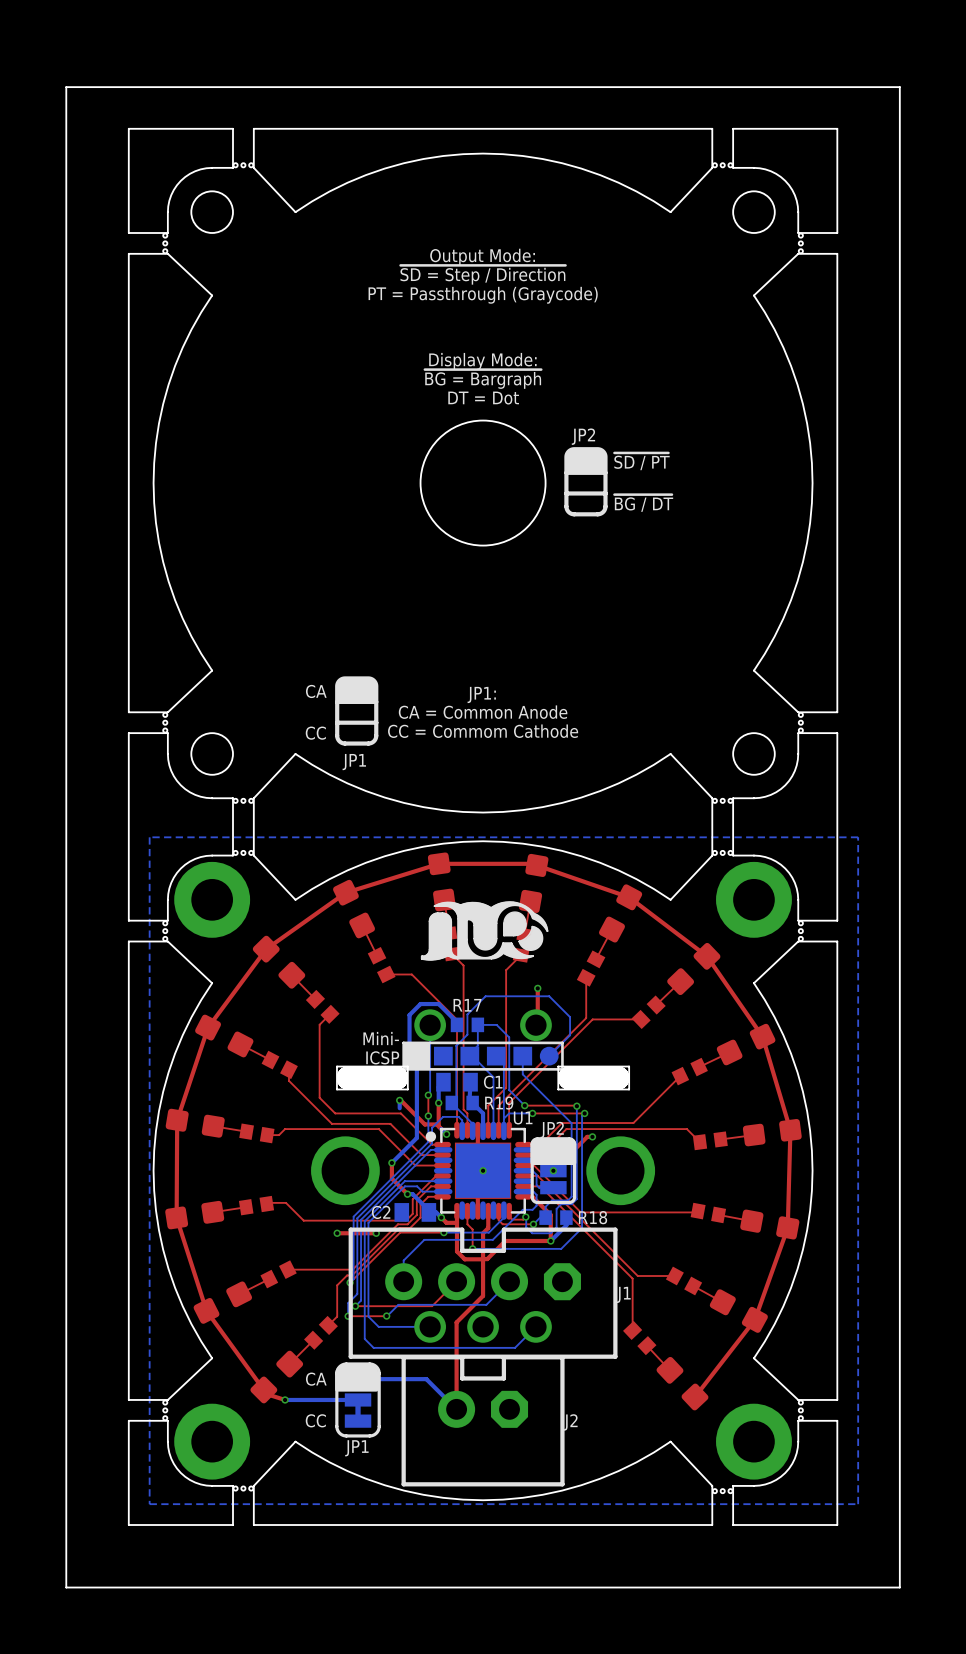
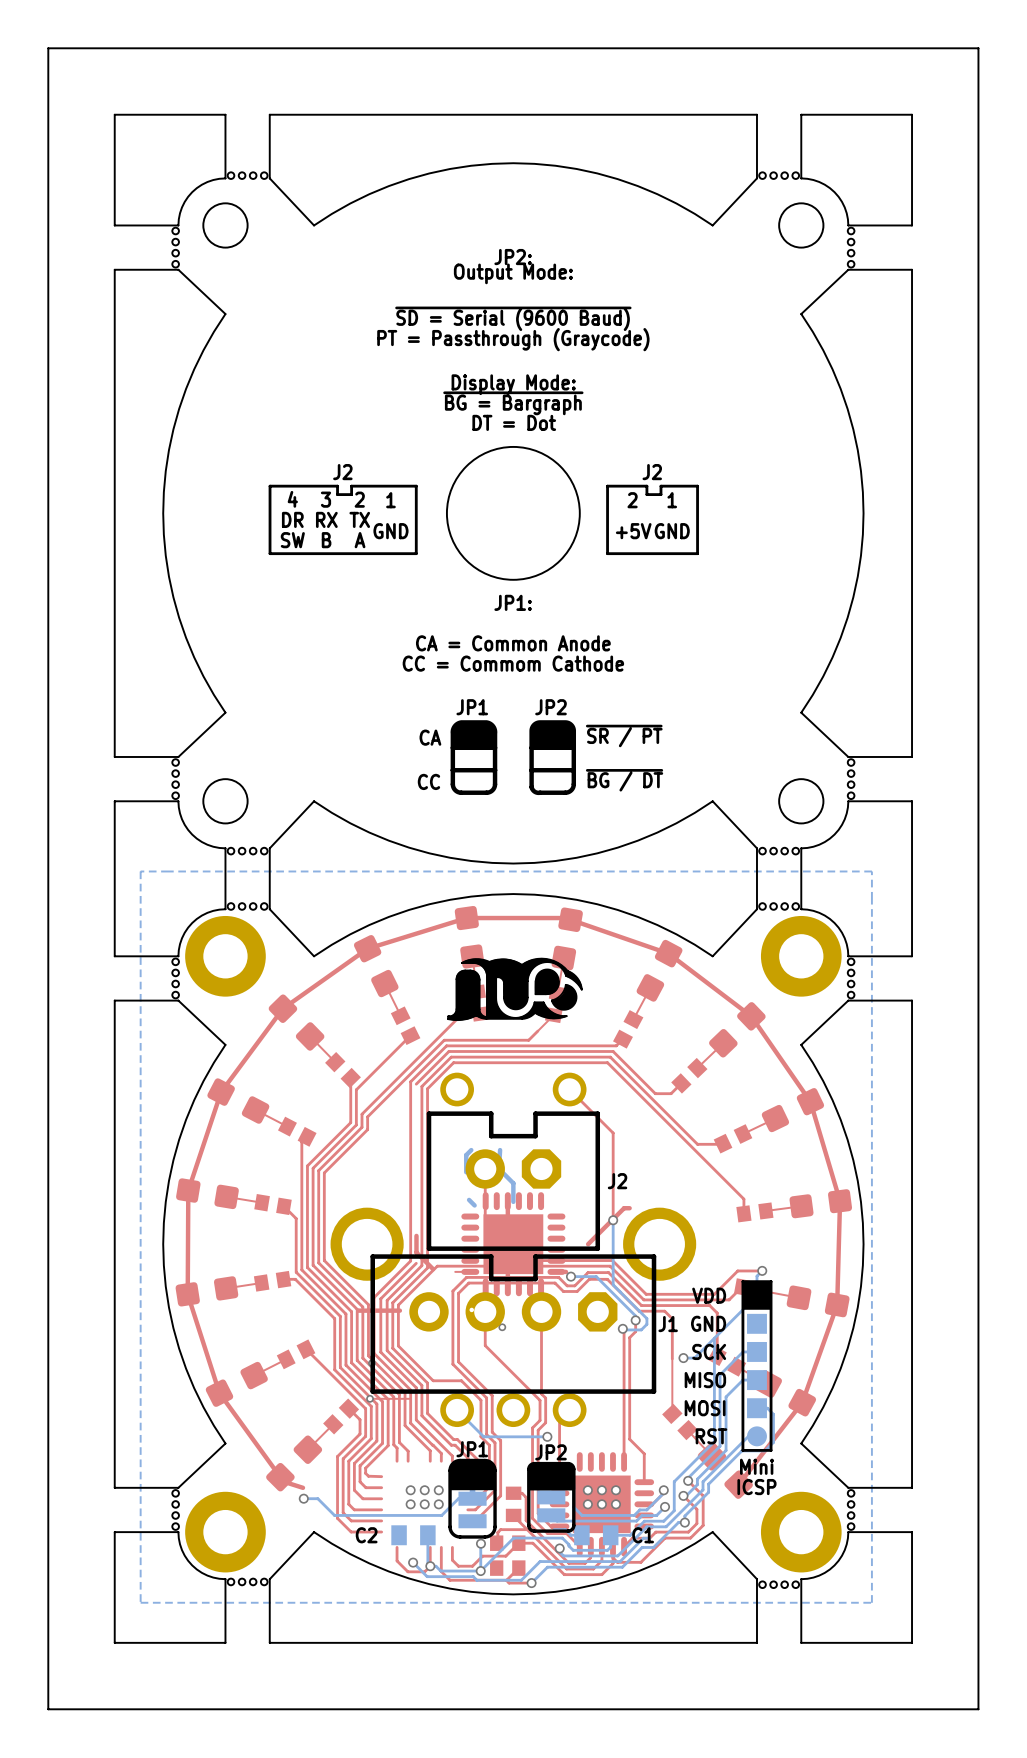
board edge: (899, 87) (899, 1587) (66, 1587) (66, 87) (899, 87) -> (978, 48) (978, 1709) (48, 1709) (48, 48) (978, 48)
board edge: (712, 128) (253, 128) -> (756, 136) (756, 114) (269, 114) (269, 136)
hole: none -> (231, 175)
hole: none -> (242, 175)
hole: (235, 165) -> none
hole: none -> (253, 175)
hole: (243, 165) -> none
hole: none -> (264, 175)
hole: (251, 165) -> none
hole: (714, 165) -> none
hole: none -> (762, 175)
hole: (722, 165) -> none
hole: none -> (773, 175)
hole: (730, 165) -> none
hole: none -> (784, 175)
hole: none -> (795, 175)
board edge: (212, 167) (232, 167) (232, 128) (128, 128) (128, 232) (167, 232) (167, 212) -> (225, 178) (225, 114) (114, 114) (114, 225) (178, 225)
board edge: (753, 167) (733, 167) (733, 128) (837, 128) (837, 232) (798, 232) (798, 212) -> (801, 178) (801, 114) (912, 114) (912, 225) (848, 225)
hole: none -> (175, 231)
hole: none -> (851, 231)
hole: none -> (175, 242)
hole: none -> (851, 242)
hole: (165, 235) -> none
hole: (800, 235) -> none
hole: none -> (175, 253)
hole: none -> (851, 253)
hole: (165, 243) -> none
text: none -> JP2: (513, 257)
hole: (800, 243) -> none
hole: none -> (175, 264)
hole: none -> (851, 264)
hole: (165, 251) -> none
hole: (800, 251) -> none
board edge: (128, 253) (128, 712) -> (136, 269) (114, 269) (114, 756) (136, 756)
board edge: (837, 253) (837, 712) -> (889, 269) (912, 269) (912, 756) (889, 756)
text: ~{SD = Step / Direction} (483, 275) -> none
text position: PT = Passthrough (Graycode) (483, 295) -> PT = Passthrough (Graycode) (513, 339)
text: none -> ~{SD = Serial (9600 Baud)} (513, 318)
text position: JP2 (583, 436) -> JP2 (551, 707)
text: none -> J2 (342, 472)
text: none -> J2 (652, 472)
drawing: [564, 447, 608, 475] -> none
line: none -> (416, 486) (351, 486) (351, 494) (337, 494) (337, 486) (270, 486) (270, 553) (416, 553) (416, 486)
line: none -> (697, 486) (697, 553) (607, 553) (607, 486) (646, 486) (646, 494) (660, 494) (660, 486) (697, 486)
text: ~{SD / PT} (642, 461) -> none
text: none -> 4 (292, 499)
text: none -> 3 (325, 499)
text: none -> 2 (359, 499)
text: none -> 1 (390, 500)
text: none -> 2 (632, 500)
text: none -> 1 (672, 500)
line: (605, 472) (605, 506) (603, 512) (597, 514) (573, 514) (568, 512) (566, 506) (566, 472) (605, 472) -> none
text: none -> DR (292, 519)
text: none -> RX (326, 519)
text: none -> TX (359, 519)
line: (605, 493) (566, 493) -> none
text: none -> GND (390, 531)
text: none -> +5V (633, 531)
text: none -> GND (672, 531)
text position: ~{BG / DT} (643, 503) -> ~{BG / DT} (624, 780)
text: none -> SW (292, 540)
text: none -> B (326, 540)
text: none -> A (360, 540)
drawing: [335, 676, 379, 704] -> none
drawing: none -> [450, 720, 498, 750]
drawing: none -> [529, 720, 577, 750]
text position: CA (316, 691) -> CA (430, 737)
text: none -> ~{SR / PT} (624, 735)
text position: JP1: (481, 694) -> JP1: (513, 602)
line: (376, 701) (376, 735) (373, 741) (368, 743) (343, 743) (339, 741) (337, 735) (337, 701) (376, 701) -> none
line: none -> (495, 747) (452, 747) (452, 784) (455, 790) (461, 792) (487, 792) (492, 790) (495, 784) (495, 747)
line: none -> (573, 747) (573, 784) (571, 790) (565, 792) (538, 792) (533, 791) (531, 787) (531, 747) (573, 747)
text position: CA = Common Anode (483, 712) -> CA = Common Anode (513, 643)
hole: (165, 714) -> none
hole: (800, 714) -> none
hole: none -> (175, 762)
hole: none -> (851, 762)
hole: (165, 722) -> none
line: (376, 722) (337, 722) -> none
hole: (800, 722) -> none
line: none -> (495, 770) (452, 770)
line: none -> (573, 770) (531, 770)
hole: none -> (175, 773)
hole: none -> (851, 773)
hole: (165, 730) -> none
hole: (800, 730) -> none
text position: CC = Commom Cathode (483, 731) -> CC = Commom Cathode (513, 663)
text position: CC (315, 733) -> CC (428, 781)
hole: none -> (175, 784)
hole: none -> (851, 784)
hole: none -> (175, 795)
hole: none -> (851, 795)
board edge: (167, 753) (167, 733) (128, 733) (128, 920) (167, 920) (167, 899) -> (178, 801) (114, 801) (114, 956) (178, 956)
board edge: (798, 753) (798, 733) (837, 733) (837, 920) (798, 920) (798, 899) -> (848, 801) (912, 801) (912, 956) (848, 956)
text position: JP1 (354, 762) -> JP1 (472, 707)
board edge: (212, 798) (232, 798) (232, 855) (212, 855) -> (225, 848) (225, 909)
board edge: (753, 798) (733, 798) (733, 855) (753, 855) -> (801, 848) (801, 909)
hole: none -> (231, 851)
hole: none -> (242, 851)
hole: (235, 800) -> none
hole: none -> (253, 851)
hole: (243, 800) -> none
hole: none -> (264, 851)
hole: (251, 800) -> none
hole: (714, 800) -> none
hole: none -> (762, 851)
hole: (722, 800) -> none
hole: none -> (773, 851)
hole: (730, 800) -> none
hole: none -> (784, 851)
hole: none -> (795, 851)
bottom zone outline: (858, 837) (858, 1504) (149, 1504) (149, 837) (858, 837) -> (871, 871) (871, 1602) (140, 1602) (140, 871) (871, 871)
hole: none -> (231, 906)
hole: none -> (242, 906)
hole: (235, 852) -> none
hole: none -> (253, 906)
hole: (243, 852) -> none
hole: none -> (264, 906)
hole: (251, 852) -> none
hole: (714, 852) -> none
hole: none -> (762, 906)
hole: (722, 852) -> none
hole: none -> (773, 906)
hole: (730, 852) -> none
hole: none -> (784, 906)
hole: none -> (795, 906)
hole: none -> (175, 961)
hole: none -> (851, 961)
hole: none -> (175, 972)
hole: none -> (851, 972)
hole: (165, 923) -> none
hole: (800, 923) -> none
hole: none -> (175, 983)
hole: none -> (851, 983)
hole: (165, 931) -> none
hole: (800, 931) -> none
hole: none -> (175, 995)
hole: none -> (851, 995)
hole: (165, 938) -> none
hole: (800, 938) -> none
board edge: (128, 941) (128, 1399) -> (136, 1000) (114, 1000) (114, 1487) (136, 1487)
board edge: (837, 941) (837, 1399) -> (889, 1000) (912, 1000) (912, 1487) (889, 1487)
top track: (452, 954) (463, 965) (463, 1109) (467, 1113) (467, 1130) -> (480, 1014) (462, 1014) (362, 1114) (362, 1127) (318, 1170) (318, 1262) (362, 1307) (362, 1358) (399, 1394) (399, 1442) (408, 1451) (408, 1461)
top track: (506, 970) (506, 1087) (488, 1105) (488, 1130) -> (537, 1031) (528, 1040) (444, 1040) (367, 1116) (367, 1129) (324, 1172) (324, 1260) (368, 1304) (368, 1355) (405, 1392) (405, 1425) (430, 1450) (430, 1461)
top track: (386, 974) (411, 974) (457, 1019) (457, 1130) -> (410, 1035) (356, 1089) (356, 1124) (313, 1168) (313, 1265) (357, 1309) (357, 1360) (393, 1397) (393, 1444) (397, 1448) (397, 1461)
top track: (586, 977) (586, 1018) (498, 1105) (498, 1130) -> (623, 1039) (616, 1045) (446, 1045) (410, 1081) (410, 1260) (374, 1297) (374, 1353) (410, 1390) (410, 1423) (441, 1453) (441, 1461)
top track: (537, 988) (537, 1023) (535, 1025) -> (613, 1220) (613, 1133) (569, 1089)
via: (537, 988) -> none
top track: (330, 1014) (319, 1024) (319, 1097) (335, 1113) (400, 1113) (432, 1144) (442, 1144) -> (350, 1077) (350, 1122) (307, 1165) (307, 1267) (351, 1311) (351, 1362) (388, 1399) (388, 1445) (365, 1468) (365, 1473) (368, 1476) (381, 1476)
top track: (641, 1019) (592, 1019) (509, 1103) (509, 1130) -> (681, 1083) (671, 1093) (655, 1093) (613, 1051) (448, 1051) (416, 1084)
bottom track: (457, 1024) (457, 1022) (438, 1004) (420, 1004) (409, 1015) (409, 1048) (416, 1056) (416, 1137) (391, 1162) -> none
R17 side: bottom (467, 1024) -> top (507, 1543)
bottom track: (430, 1025) (430, 1093) (428, 1095) -> none
text: Mini- (381, 1038) -> none
bottom track: (496, 1056) (503, 1063) (503, 1130) -> none
bottom track: (522, 1056) (522, 1074) (571, 1123) (571, 1196) (567, 1200) (551, 1200) (545, 1206) (545, 1217) (541, 1216) (533, 1224) -> none
bottom track: (549, 1056) (570, 1035) (570, 1017) (549, 996) (485, 996) (467, 1014) (467, 1034) (456, 1045) (456, 1107) (472, 1123) (472, 1130) -> none
text position: ICSP (382, 1057) -> ICSP (756, 1487)
part: (483, 1065) -> none
top track: (288, 1069) (288, 1080) (331, 1123) (390, 1123) (421, 1155) (442, 1155) -> (307, 1136) (301, 1142) (301, 1269) (345, 1314) (345, 1365) (382, 1401) (382, 1443) (360, 1465) (360, 1481) (365, 1487) (381, 1487)
top track: (679, 1076) (633, 1123) (562, 1123) (540, 1144) (523, 1144) -> none
top track: none -> (723, 1143) (697, 1144) (610, 1057) (451, 1057) (421, 1086) (421, 1265) (387, 1300) (387, 1350) (421, 1385) (421, 1415) (451, 1445) (455, 1445) (468, 1458) (468, 1476)
C1 position: (457, 1082) -> (596, 1535)
C1 name position: C1 (493, 1082) -> C1 (643, 1535)
top track: (428, 1095) (428, 1116) -> none
via: (428, 1095) -> none
top track: none -> (485, 1168) (485, 1250) (495, 1260) (612, 1260) (646, 1294) (714, 1294) (737, 1270) (762, 1270)
top track: (399, 1100) (424, 1124) (436, 1124) (446, 1134) -> none
bottom track: (399, 1100) (399, 1108) -> none
via: (399, 1100) -> none
top track: (438, 1103) (438, 1126) -> none
via: (438, 1103) -> none
R19 side: bottom (462, 1103) -> top (513, 1504)
top track: (524, 1105) (576, 1106) -> none
bottom track: (524, 1105) (509, 1090) (509, 1037) (496, 1024) (477, 1024) (477, 1045) (469, 1056) (472, 1056) (493, 1077) (493, 1130) -> none
via: (524, 1105) -> none
bottom track: (576, 1106) (576, 1199) (571, 1204) (561, 1204) (556, 1208) (556, 1227) (550, 1233) (532, 1233) (526, 1227) (525, 1217) -> none
via: (576, 1106) -> none
bottom track: (532, 1113) (509, 1113) (503, 1118) -> none
via: (532, 1113) -> none
top track: (584, 1113) (532, 1113) -> none
bottom track: (584, 1113) (582, 1116) (582, 1228) (561, 1248) (472, 1248) -> none
via: (584, 1113) -> none
bottom track: (428, 1116) (428, 1141) (353, 1216) (353, 1279) (350, 1282) -> none
via: (428, 1116) -> none
bottom track: (462, 1130) (462, 1120) (458, 1116) (443, 1116) (432, 1127) (432, 1143) (357, 1218) (357, 1294) (348, 1303) (348, 1316) -> none
via: (446, 1134) -> none
top track: (267, 1135) (279, 1135) (285, 1129) (378, 1129) (415, 1165) (442, 1165) -> (283, 1206) (296, 1218) (296, 1272) (340, 1316) (340, 1367) (376, 1404) (376, 1441) (354, 1463) (354, 1490) (362, 1498) (381, 1498)
via: (592, 1136) -> none
drawing: [530, 1137, 577, 1166] -> none
top track: (699, 1142) (686, 1129) (566, 1129) (540, 1155) (523, 1155) -> (743, 1213) (743, 1199) (607, 1062) (453, 1062) (427, 1088) (427, 1267) (392, 1302) (392, 1348) (427, 1383) (427, 1413) (483, 1465) (483, 1484) (480, 1487) (467, 1487)
bottom track: none -> (613, 1220) (613, 1284) (646, 1318) (646, 1324) (641, 1329) (622, 1328)
via: none -> (613, 1220)
bottom track: (443, 1149) (430, 1149) (361, 1219) (361, 1300) (355, 1306) -> none
via: (391, 1162) -> none
top track: (523, 1165) (534, 1165) (580, 1212) (696, 1212) -> (467, 1498) (477, 1498) (489, 1486) (489, 1445) (480, 1436) (480, 1400) (461, 1380) (433, 1380) (398, 1345) (398, 1305) (437, 1266) (610, 1266) (643, 1299) (729, 1299) (740, 1288)
U1 side: bottom (478, 1170) -> top (601, 1504)
via: (483, 1170) -> none
bottom track: (522, 1170) (532, 1170) (536, 1174) (536, 1185) (539, 1187) (553, 1187) -> none
JP2 position: (553, 1170) -> (551, 1497)
via: (553, 1170) -> none
top track: (442, 1175) (436, 1175) (412, 1199) (412, 1213) (405, 1220) (303, 1220) (285, 1202) (266, 1204) -> (381, 1509) (354, 1509) (348, 1504) (348, 1461) (371, 1438) (371, 1406) (334, 1369) (334, 1318) (295, 1279) (283, 1279)
top track: (523, 1175) (537, 1175) (637, 1275) (674, 1275) -> (467, 1509) (475, 1509) (495, 1490) (495, 1442) (486, 1434) (486, 1397) (452, 1364) (452, 1291) (466, 1277) (558, 1277) (567, 1285) (574, 1285) (588, 1272) (608, 1272) (641, 1305) (709, 1305) (717, 1313) (717, 1356)
bottom track: (443, 1181) (404, 1181) (364, 1221) (364, 1338) (373, 1347) (515, 1347) (535, 1326) -> none
top track: (442, 1186) (430, 1186) (416, 1200) (416, 1215) (407, 1224) (397, 1224) (352, 1269) (287, 1269) -> (381, 1520) (351, 1520) (343, 1512) (343, 1458) (365, 1436) (365, 1408) (306, 1349)
top track: (523, 1186) (540, 1186) (632, 1278) -> (467, 1520) (475, 1520) (500, 1495) (500, 1440) (492, 1432) (492, 1395) (458, 1361) (458, 1293) (468, 1283) (555, 1283) (563, 1291) (577, 1291) (589, 1279) (607, 1279) (639, 1311) (664, 1311) (672, 1318) (672, 1358)
top track: none -> (416, 1263) (380, 1298) (380, 1352) (416, 1387) (416, 1419) (452, 1456) (452, 1461)
bottom track: (443, 1191) (422, 1191) (417, 1186) (404, 1186) (368, 1222) (368, 1316) (378, 1326) (430, 1326) -> (547, 1436) (483, 1436) (457, 1410)
bottom track: (522, 1191) (533, 1191) (536, 1194) (536, 1205) (532, 1209) (522, 1209) (492, 1239) (424, 1239) (403, 1260) (403, 1281) -> none
bottom track: (407, 1194) (412, 1194) (428, 1212) (436, 1212) (441, 1217) -> none
via: (407, 1194) -> none
bottom track: none -> (762, 1270) (756, 1276) (756, 1295) (694, 1358) (683, 1358)
via: none -> (762, 1270)
top track: (428, 1196) (420, 1204) (420, 1217) (410, 1228) (399, 1228) (352, 1275) (347, 1275) (337, 1285) (337, 1316) (328, 1325) -> (381, 1532) (351, 1532) (337, 1518) (337, 1456) (360, 1434) (360, 1419) (348, 1408)
top track: (532, 1196) (550, 1215) (550, 1240) (505, 1240) (487, 1259) (483, 1259) -> none
bottom track: none -> (570, 1276) (596, 1276) (635, 1316) (635, 1320)
via: none -> (570, 1276)
bottom track: (503, 1210) (503, 1217) (488, 1232) (443, 1232) -> none
top track: (457, 1211) (457, 1251) (464, 1259) (483, 1259) -> none
top track: (467, 1211) (467, 1224) (472, 1229) (472, 1248) -> none
top track: (488, 1211) (488, 1228) (483, 1233) (483, 1295) (456, 1322) (456, 1409) -> none
top track: (498, 1211) (498, 1220) (502, 1224) (533, 1224) -> none
top track: (509, 1211) (509, 1216) (512, 1219) (523, 1219) (525, 1217) -> none
C2 name position: C2 (381, 1212) -> C2 (366, 1535)
C2 position: (415, 1212) -> (413, 1535)
top track: (441, 1217) (446, 1222) (457, 1222) -> none
via: (441, 1217) -> none
via: (525, 1217) -> none
R18 side: bottom (555, 1217) -> top (507, 1568)
bottom track: (566, 1217) (566, 1225) (550, 1240) -> none
via: (533, 1224) -> none
top track: (443, 1232) (400, 1232) (350, 1282) -> none
via: (337, 1233) -> none
via: (376, 1233) -> none
top track: none -> (485, 1311) (485, 1345) (540, 1400) (540, 1420) (532, 1427) (532, 1518) (547, 1533) (566, 1533) (579, 1546)
top track: none -> (541, 1311) (541, 1393) (545, 1398) (545, 1422) (538, 1430) (538, 1513) (550, 1526) (559, 1526)
via: (550, 1240) -> none
top track: none -> (635, 1320) (635, 1331) (629, 1337) (629, 1439) (644, 1453) (644, 1482)
via: none -> (635, 1320)
top track: none -> (622, 1328) (624, 1461)
via: none -> (622, 1328)
bottom track: none -> (714, 1338) (714, 1441) (674, 1481) (674, 1510) (663, 1521) (644, 1521) (630, 1535) (610, 1535) (610, 1547) (607, 1550) (573, 1550) (562, 1538) (513, 1538) (480, 1571)
bottom track: none -> (756, 1351) (743, 1351) (720, 1374) (720, 1446) (688, 1478) (688, 1480)
via: none -> (683, 1358)
top track: (456, 1281) (432, 1306) (355, 1306) -> none
bottom track: (509, 1281) (486, 1304) (398, 1304) (386, 1316) -> none
part: none -> (756, 1366)
J1 position: (483, 1293) -> (513, 1324)
bottom track: none -> (756, 1380) (742, 1380) (726, 1396) (726, 1450) (697, 1479) (697, 1484) (686, 1495) (683, 1495)
via: (355, 1306) -> none
via: (386, 1316) -> none
bottom track: none -> (756, 1408) (767, 1408) (773, 1414) (773, 1442) (765, 1450) (741, 1450) (708, 1484) (708, 1492) (684, 1516) (684, 1522) (678, 1522) (653, 1547) (642, 1547) (622, 1567) (547, 1567) (531, 1583)
top track: none -> (569, 1410) (559, 1420) (559, 1482)
via: none -> (547, 1436)
bottom track: none -> (756, 1436) (748, 1436) (703, 1481) (703, 1489) (666, 1526) (646, 1526) (617, 1555) (563, 1555) (559, 1552) (559, 1548)
drawing: none -> [528, 1462, 576, 1491]
drawing position: (356, 1377) -> (471, 1475)
bottom track: (358, 1378) (426, 1379) (456, 1409) -> none
text: CA (316, 1379) -> none
text: none -> Mini (756, 1466)
bottom track: none -> (551, 1479) (568, 1479) (573, 1484) (573, 1507) (582, 1515) (634, 1515) (639, 1509) (646, 1509) (663, 1493) (663, 1490)
top track: none -> (688, 1480) (703, 1495) (703, 1525) (690, 1538) (665, 1538) (640, 1562) (617, 1562) (613, 1557)
via: none -> (688, 1480)
bottom track: (285, 1399) (358, 1399) (358, 1421) -> none
via: (285, 1399) -> none
JP1 rotation: 0° (358, 1399) -> 180° (472, 1498)
JP1 position: (358, 1399) -> (472, 1498)
hole: (165, 1402) -> none
via: none -> (410, 1490)
via: none -> (424, 1490)
via: none -> (438, 1490)
via: none -> (587, 1490)
via: none -> (601, 1490)
via: none -> (615, 1490)
via: none -> (663, 1490)
hole: (800, 1402) -> none
hole: none -> (175, 1493)
top track: none -> (513, 1493) (522, 1493) (526, 1497) (526, 1520) (568, 1563) (585, 1563) (590, 1557) (590, 1547)
hole: none -> (851, 1493)
top track: none -> (683, 1495) (696, 1509) (696, 1523) (688, 1532) (655, 1532) (649, 1538) (632, 1538) (624, 1546)
via: none -> (683, 1495)
hole: (165, 1410) -> none
via: none -> (303, 1498)
bottom track: none -> (472, 1498) (458, 1498) (441, 1515) (334, 1515) (317, 1498) (303, 1498)
hole: (800, 1410) -> none
hole: none -> (175, 1504)
via: none -> (410, 1504)
via: none -> (424, 1504)
via: none -> (438, 1504)
via: none -> (587, 1504)
via: none -> (601, 1504)
via: none -> (615, 1504)
hole: none -> (851, 1504)
bottom track: none -> (665, 1506) (656, 1515) (642, 1515) (636, 1521) (557, 1521) (551, 1515)
via: none -> (665, 1506)
hole: (165, 1418) -> none
hole: (800, 1418) -> none
text: CC (315, 1420) -> none
J2 position: (483, 1420) -> (513, 1181)
J2 name position: J2 (570, 1422) -> J2 (617, 1181)
top track: none -> (513, 1515) (566, 1569) (593, 1569) (601, 1560) (601, 1546)
hole: none -> (175, 1515)
hole: none -> (851, 1515)
via: none -> (684, 1522)
hole: none -> (175, 1526)
hole: none -> (851, 1526)
top track: none -> (527, 1529) (500, 1529) (497, 1532) (496, 1543)
bottom track: none -> (554, 1529) (565, 1529) (570, 1535) (581, 1535)
board edge: (167, 1441) (167, 1420) (128, 1420) (128, 1525) (232, 1525) (232, 1485) (212, 1485) -> (178, 1532) (114, 1532) (114, 1642) (225, 1642) (225, 1579)
board edge: (798, 1441) (798, 1420) (837, 1420) (837, 1525) (733, 1525) (733, 1485) (753, 1485) -> (848, 1532) (912, 1532) (912, 1642) (801, 1642) (801, 1579)
bottom track: none -> (427, 1535) (427, 1563) (430, 1566) (435, 1566) (440, 1571) (480, 1571)
bottom track: none -> (649, 1538) (643, 1538) (620, 1561) (540, 1561) (521, 1580) (476, 1580) (473, 1576) (427, 1576) (413, 1562)
bottom track: none -> (480, 1543) (480, 1571)
via: none -> (480, 1543)
top track: none -> (612, 1546) (613, 1563) (601, 1574) (564, 1574) (532, 1543) (518, 1543) (505, 1556) (482, 1556) (472, 1566) (458, 1566) (452, 1560) (452, 1547)
top track: none -> (430, 1547) (430, 1566) (424, 1571) (407, 1571) (397, 1560) (397, 1547)
top track: none -> (441, 1547) (441, 1571) (450, 1580) (506, 1580) (518, 1568)
via: none -> (559, 1548)
via: none -> (413, 1562)
via: none -> (430, 1566)
via: none -> (480, 1571)
top track: none -> (506, 1580) (509, 1583) (531, 1583)
hole: none -> (231, 1581)
hole: none -> (242, 1581)
hole: (235, 1488) -> none
hole: none -> (253, 1581)
hole: (243, 1488) -> none
hole: none -> (264, 1581)
hole: (251, 1488) -> none
via: none -> (531, 1583)
hole: (714, 1491) -> none
hole: none -> (762, 1584)
hole: (722, 1491) -> none
hole: none -> (773, 1584)
hole: (730, 1491) -> none
hole: none -> (784, 1584)
hole: none -> (795, 1584)
board edge: (712, 1525) (253, 1525) -> (756, 1620) (756, 1642) (269, 1642) (269, 1620)

